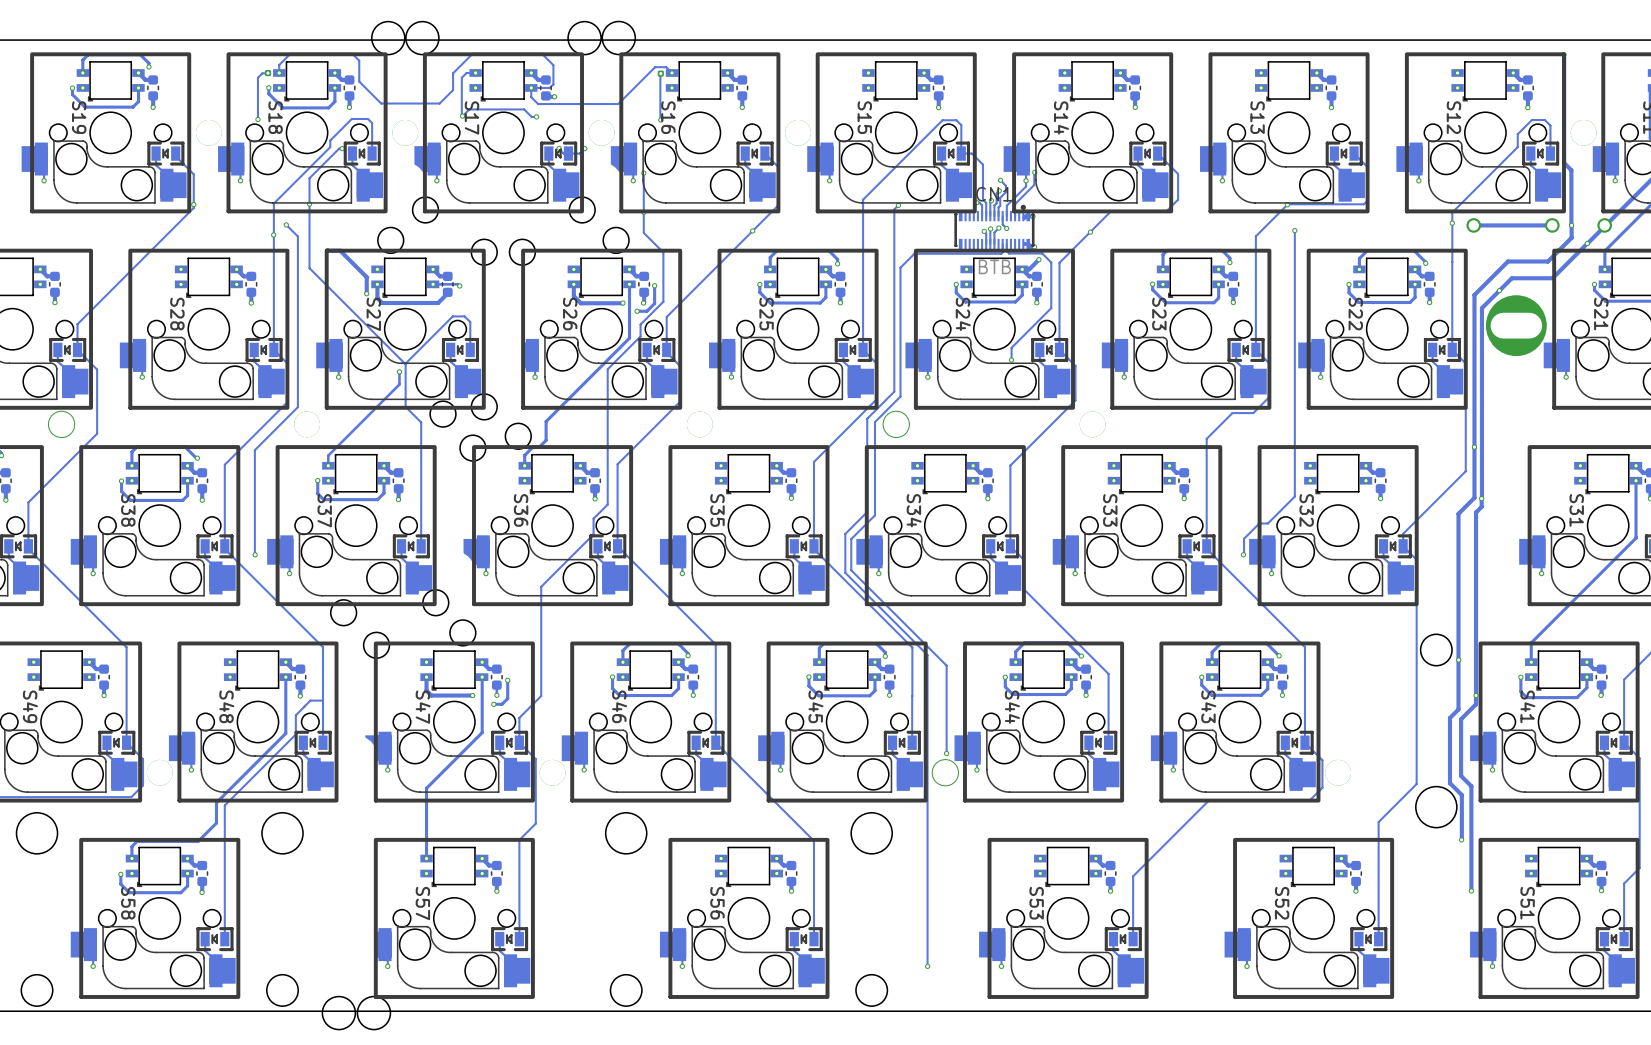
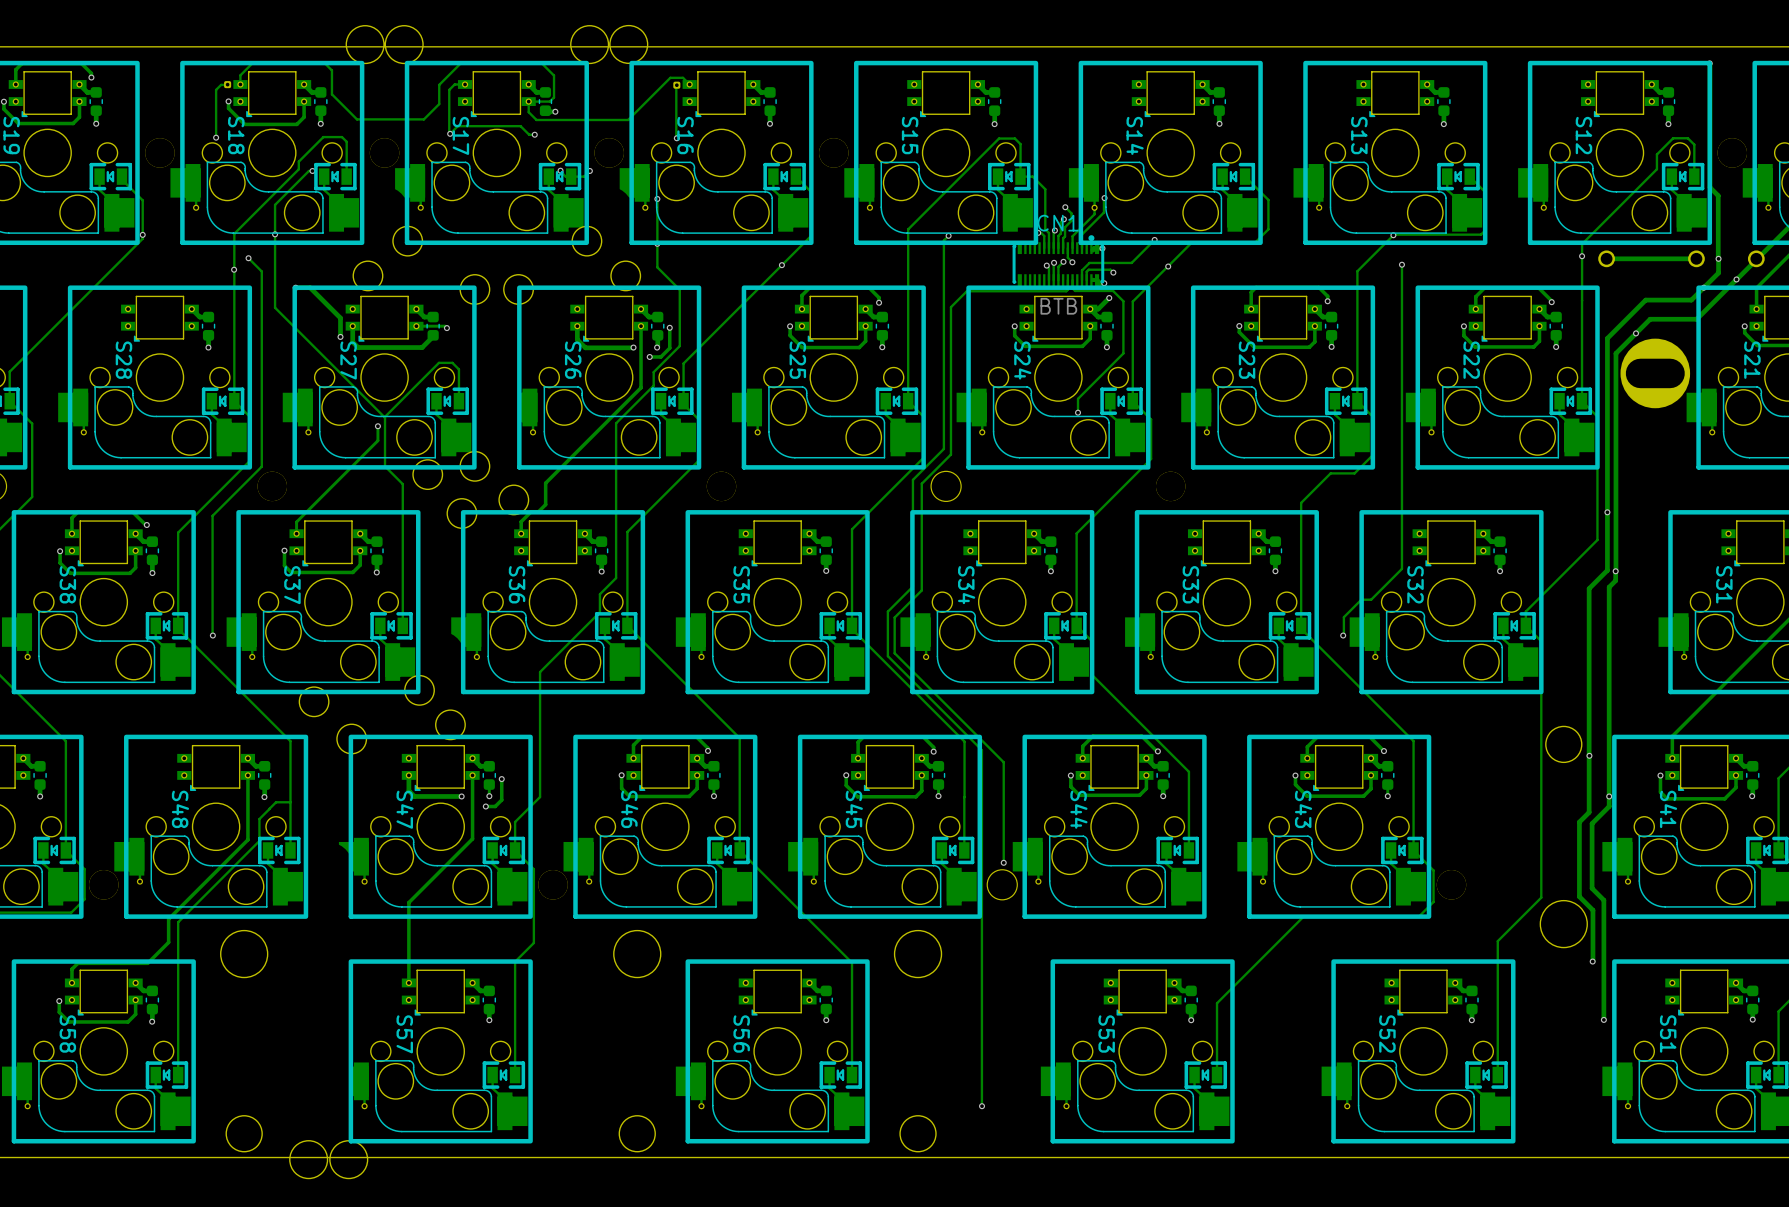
track: none -> (1154, 239) (1131, 262) (1089, 262) (1081, 270) (1081, 280)
via: none -> (1154, 239)
track: none -> (1113, 272) (1110, 269) (1088, 269) (1086, 271) (1086, 280)
via: none -> (1113, 272)

